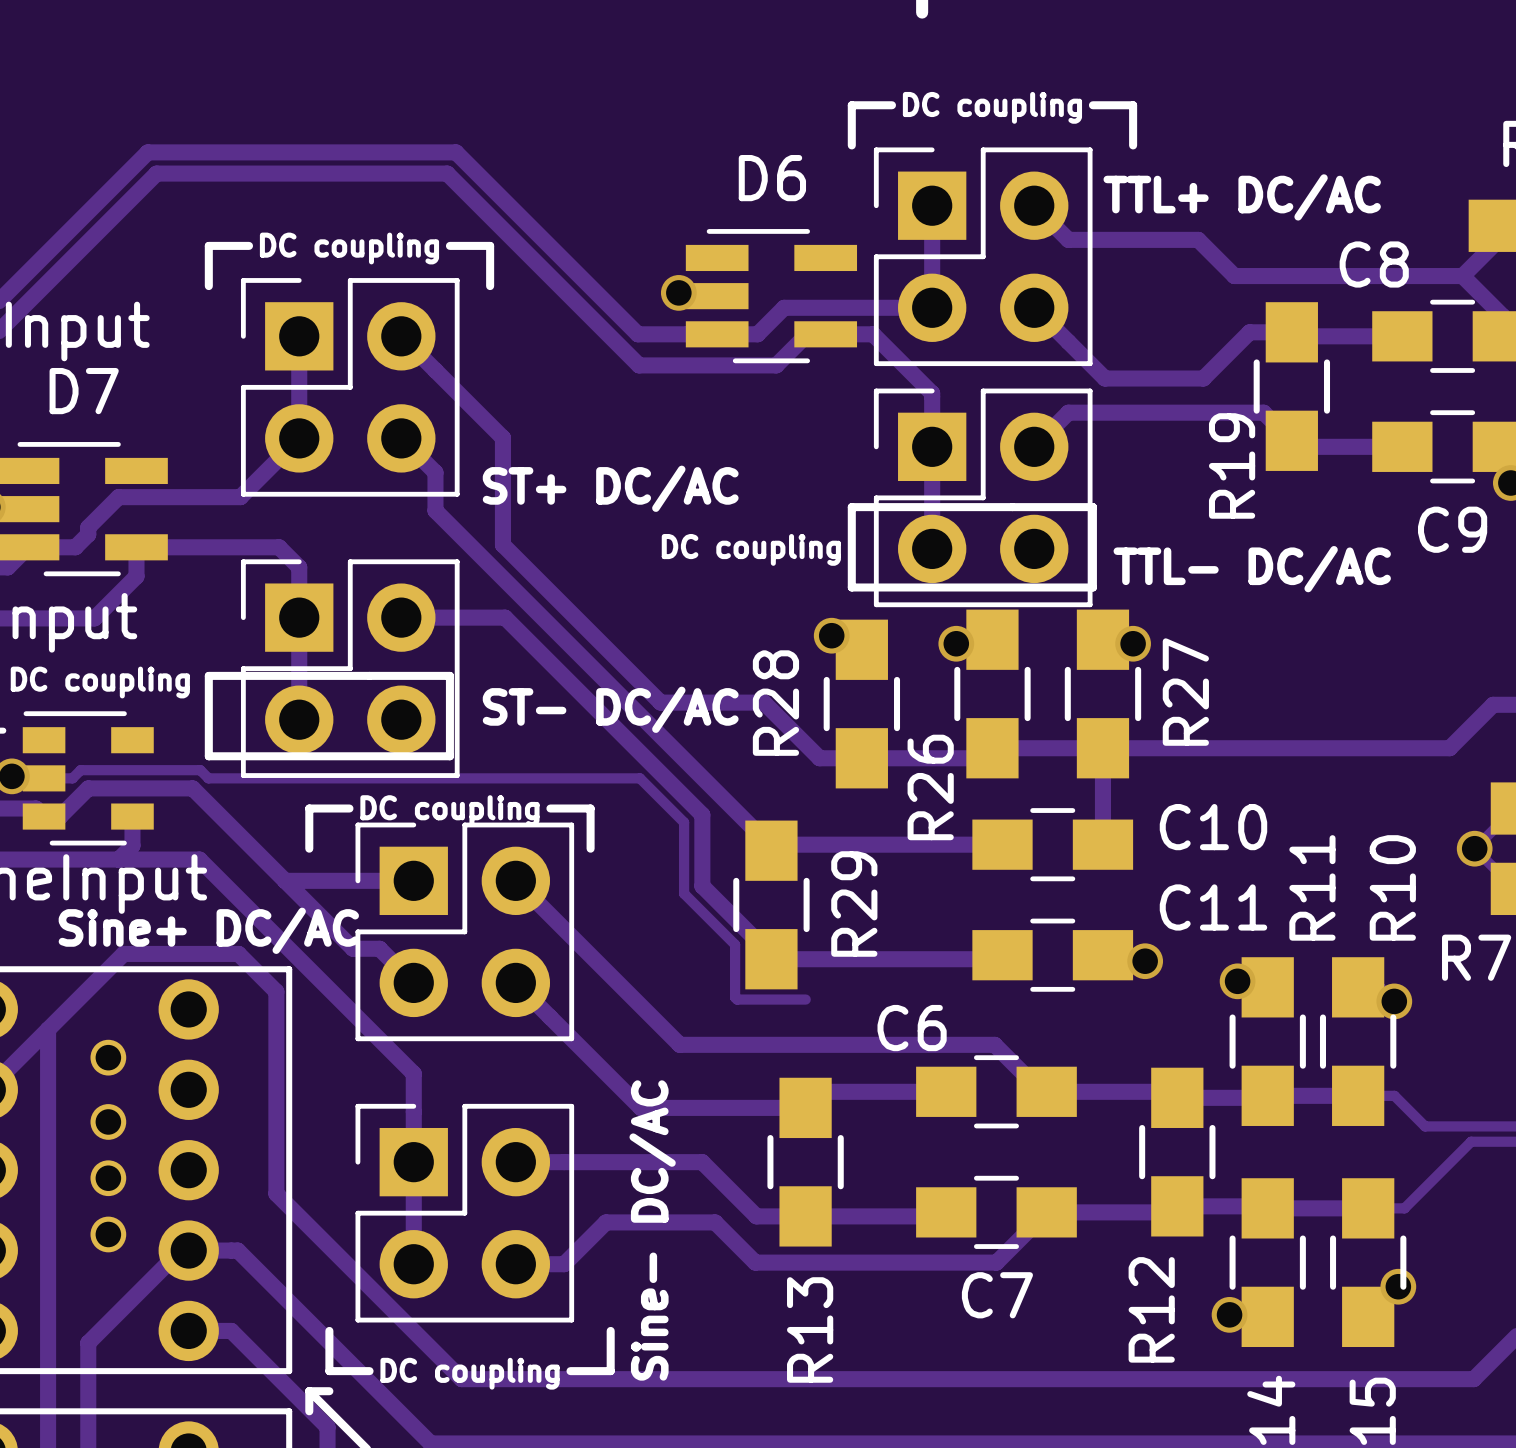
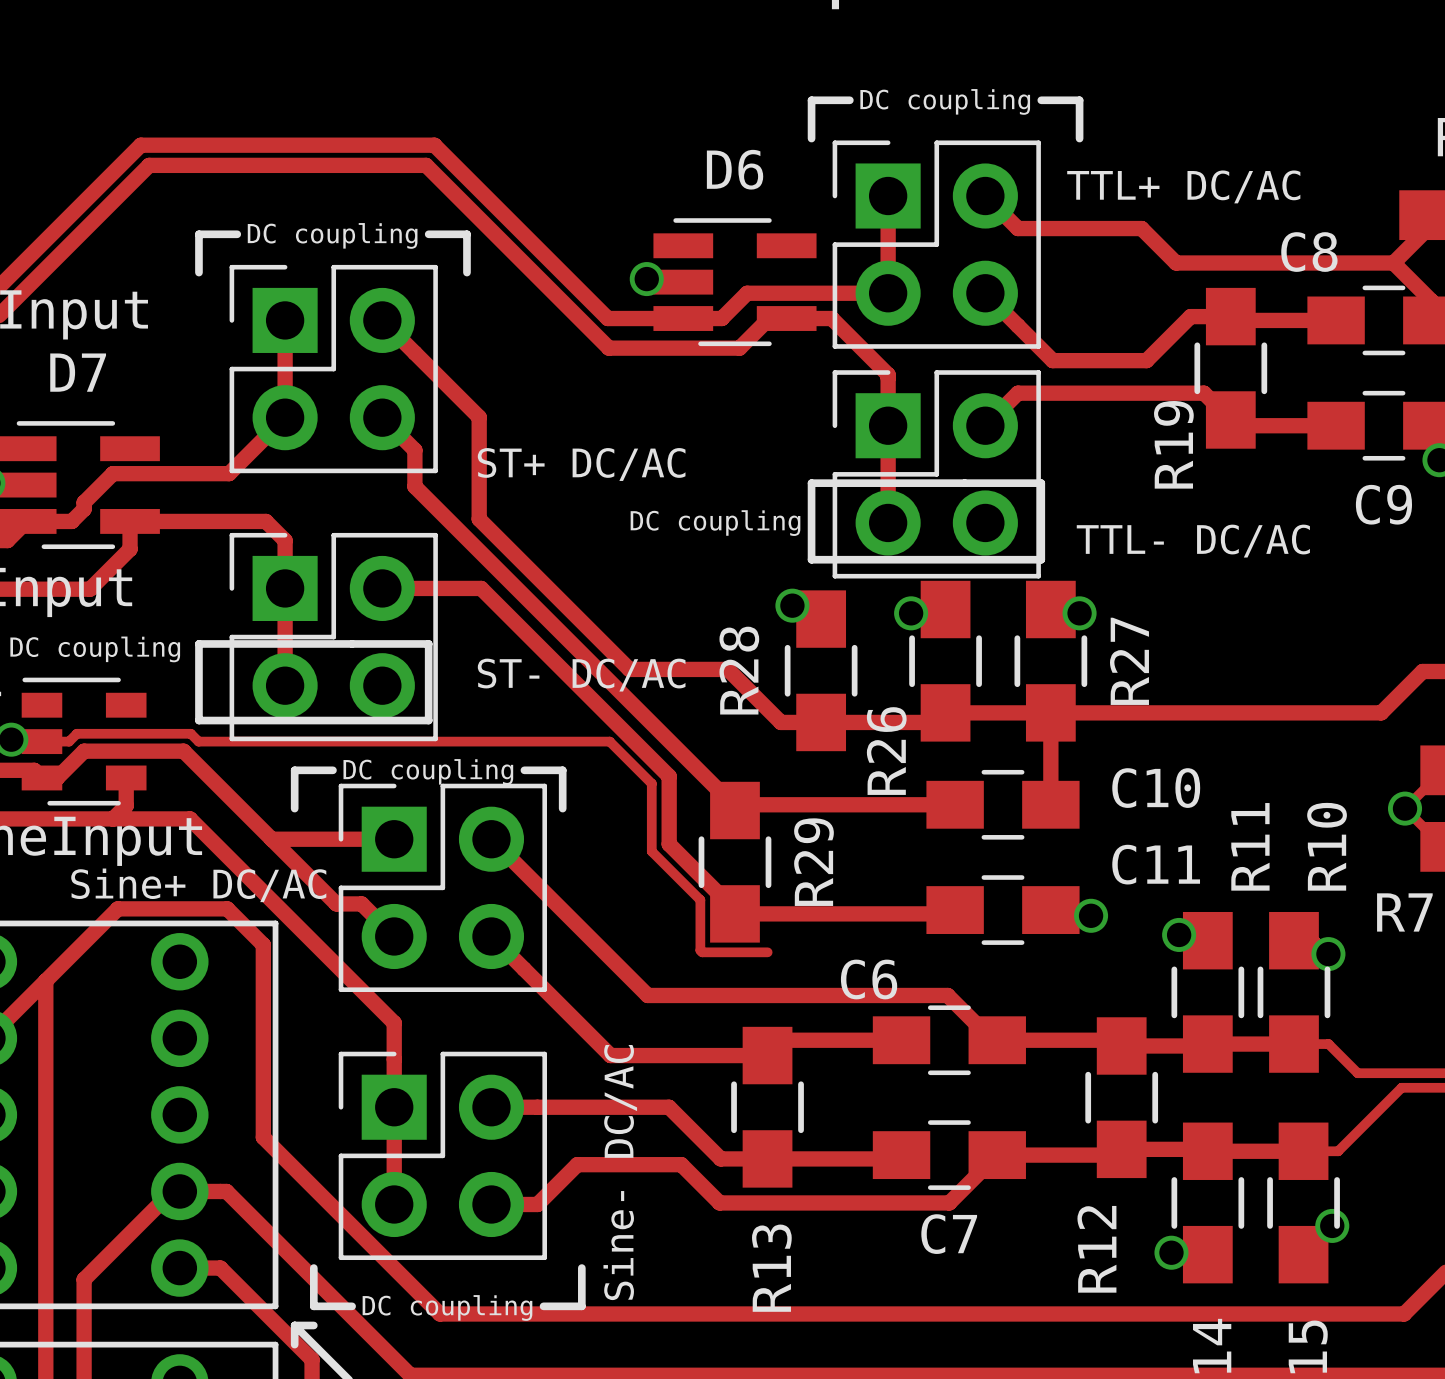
part: (108, 1057) -> none
part: (108, 1121) -> none
part: (108, 1178) -> none
part: (108, 1234) -> none

